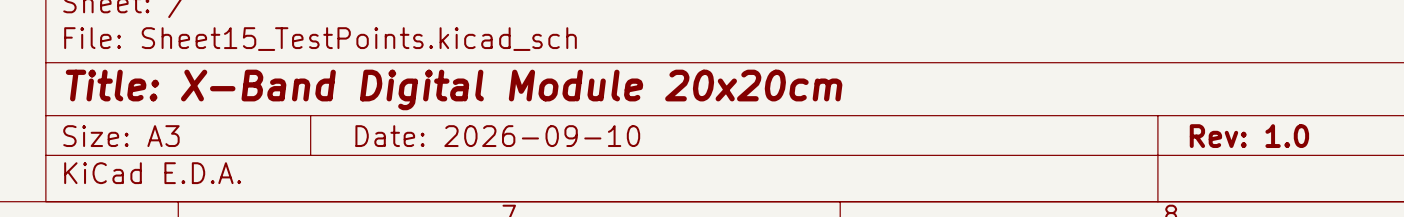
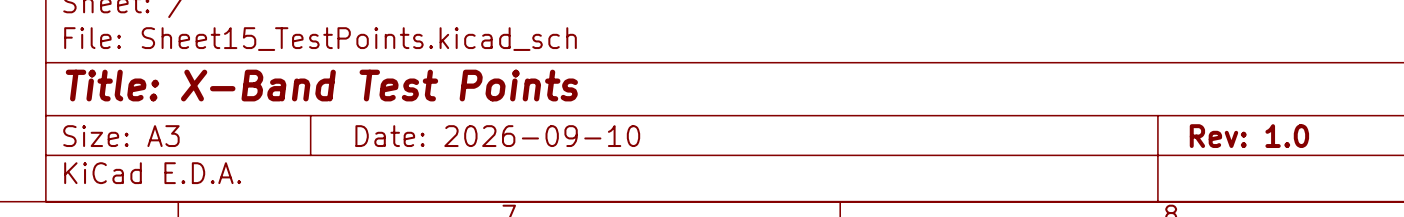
title block: Title: X-Band Digital Module 20x20cm (454, 89) -> Title: X-Band Test Points (321, 85)

